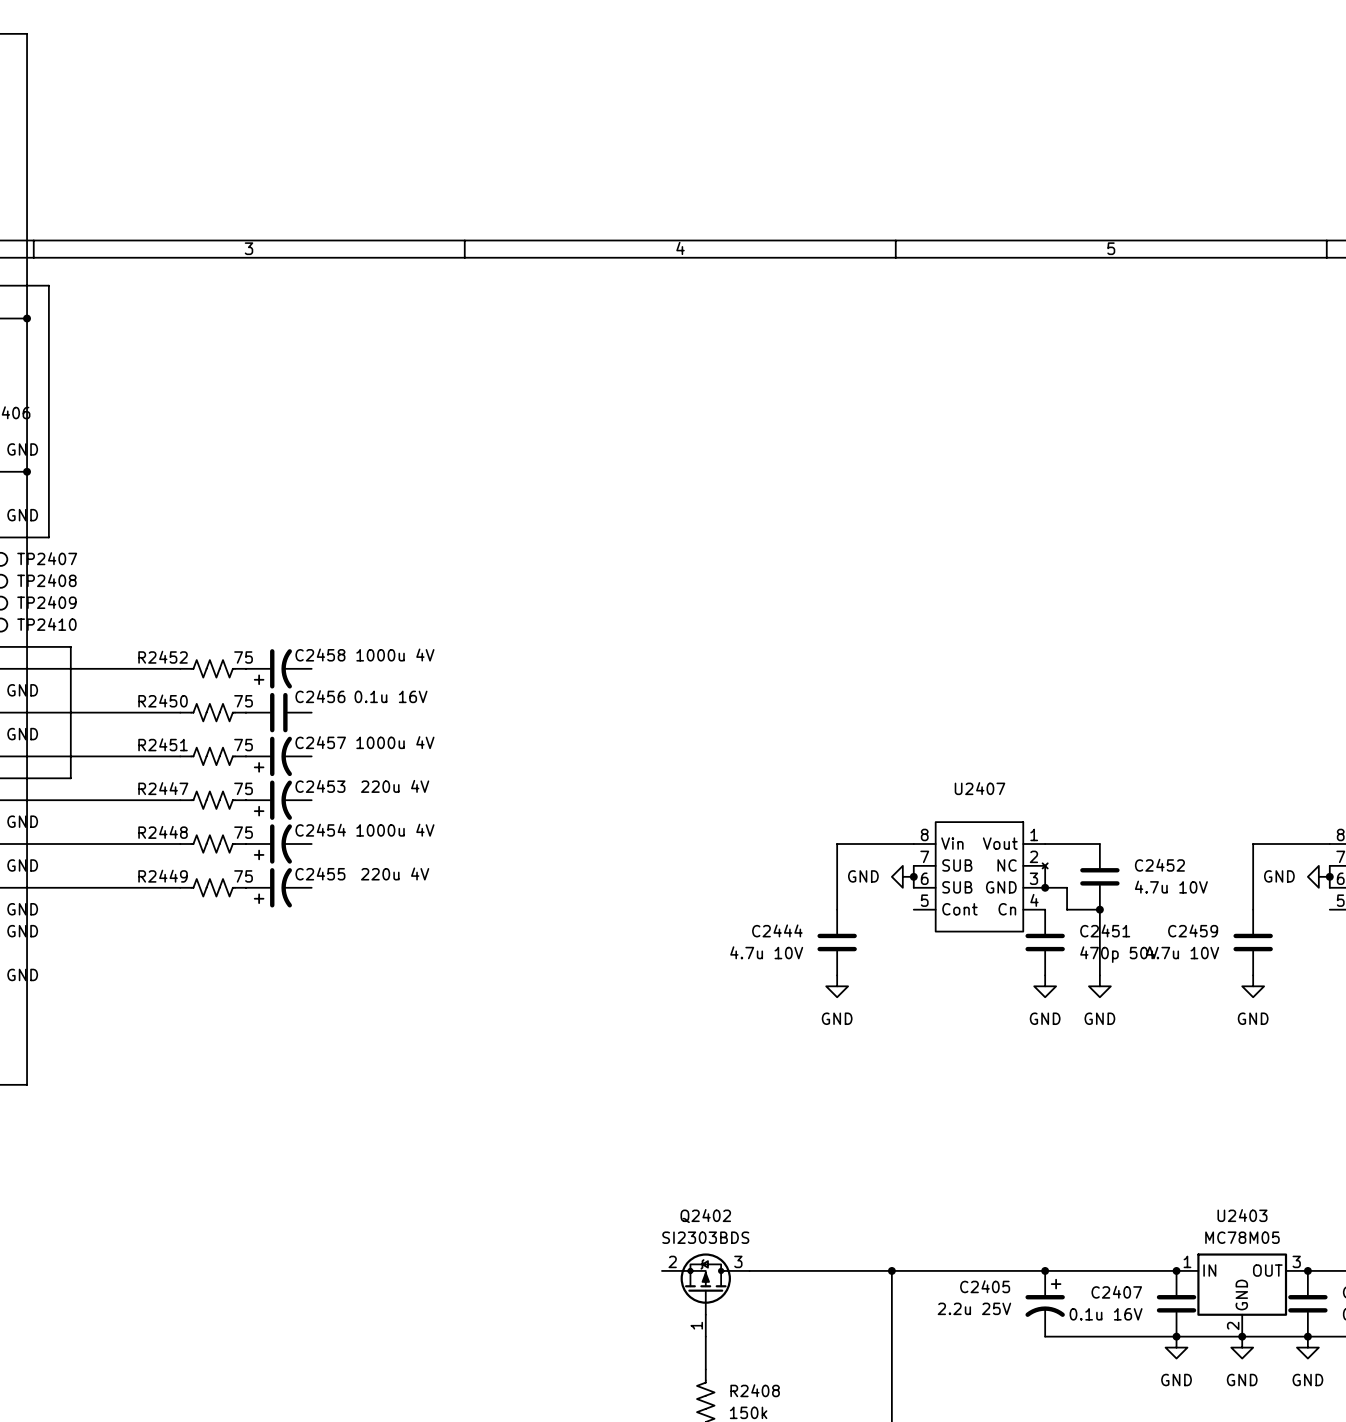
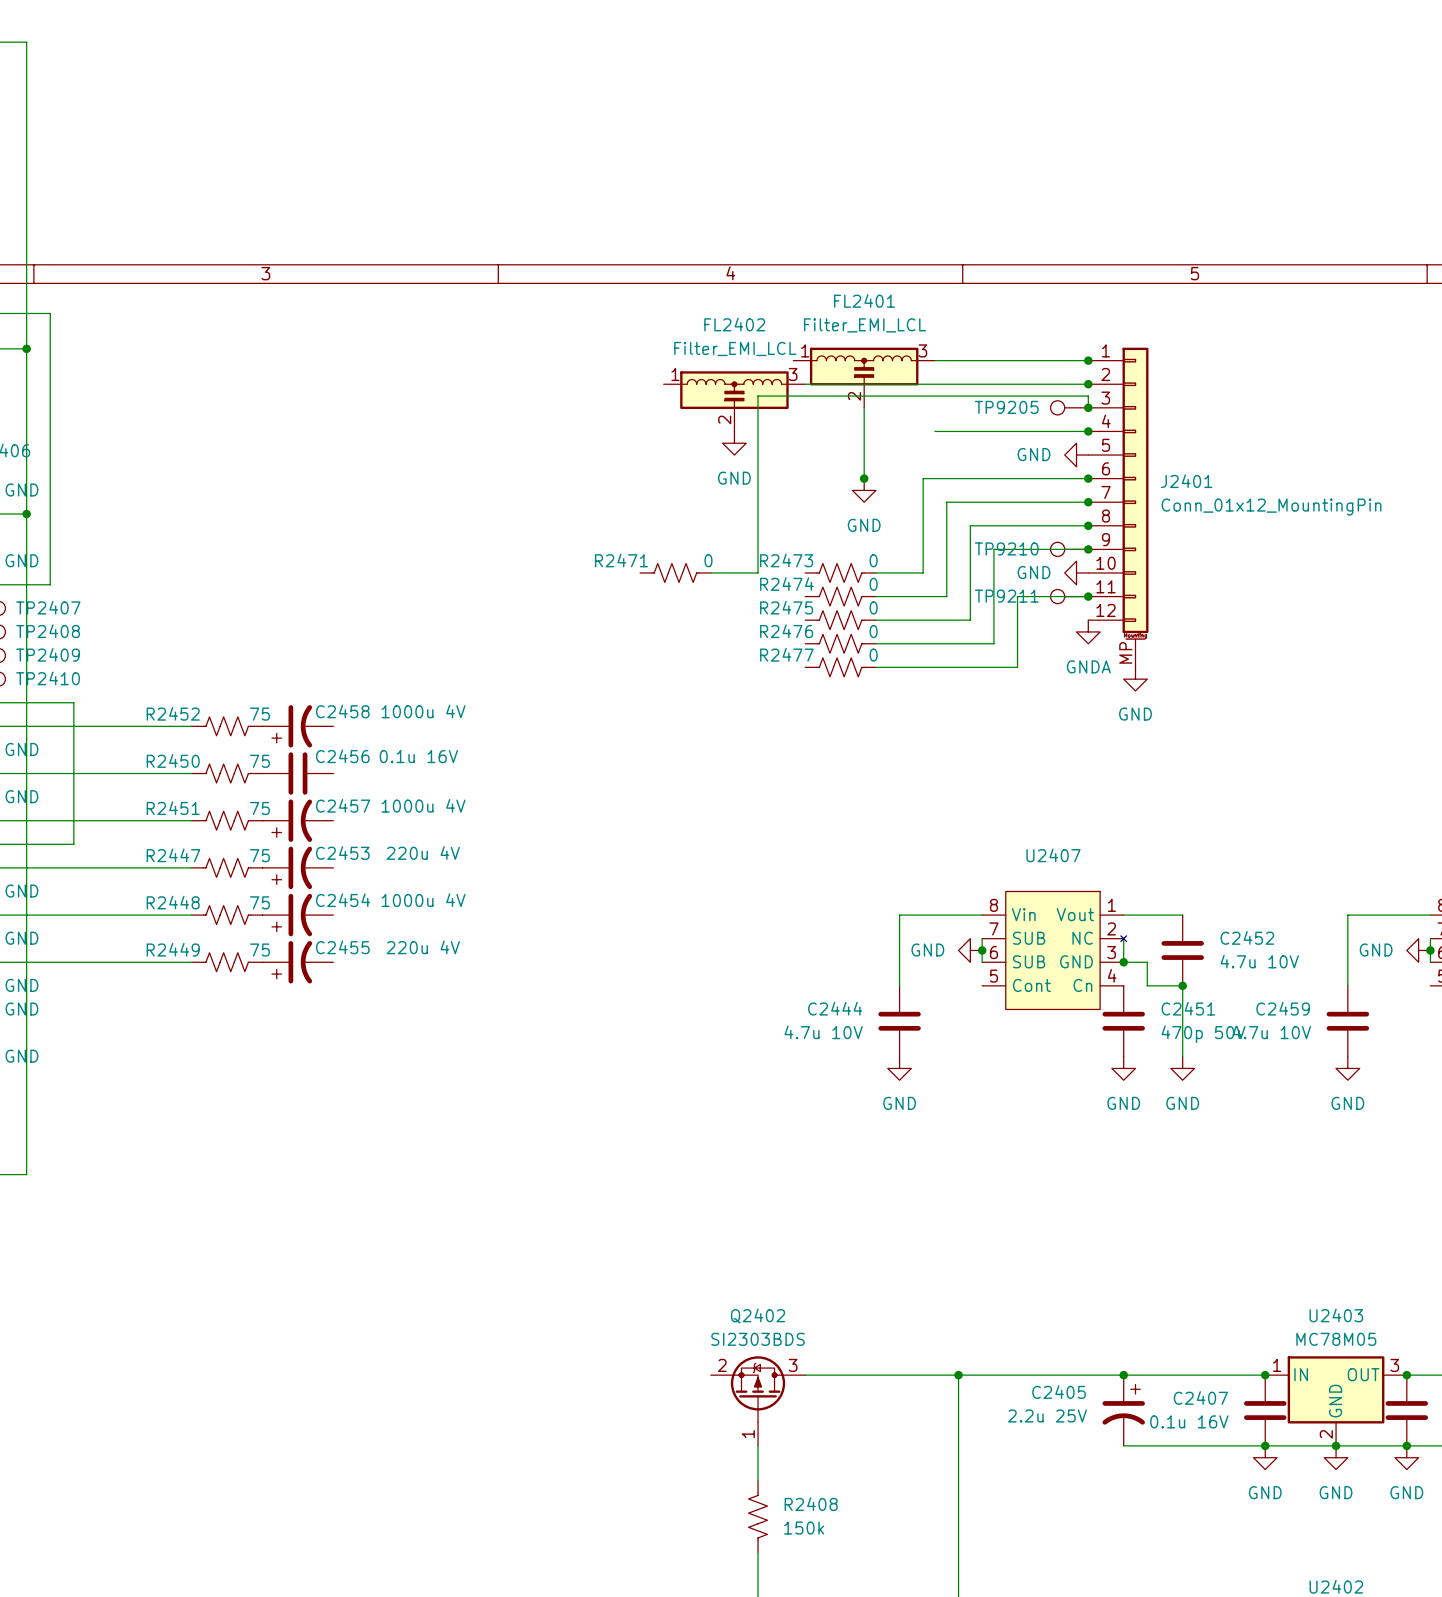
wire: none -> (934, 360) (1088, 360)
junction: none -> (1088, 360)
FL2401: none -> Filter_EMI_LCL (864, 377)
wire: none -> (805, 384) (1088, 384)
junction: none -> (1088, 384)
FL2402: none -> Filter_EMI_LCL (734, 401)
wire: none -> (864, 407) (864, 478)
TP9205: none -> (1069, 407)
wire: none -> (1088, 407) (1088, 396) (758, 396) (758, 572) (710, 572)
junction: none -> (1088, 407)
wire: none -> (934, 431) (1088, 431)
junction: none -> (1088, 431)
power symbol: none -> GND (734, 443)
power symbol: none -> GND (1076, 455)
junction: none -> (864, 478)
wire: none -> (1088, 478) (923, 478) (923, 572) (875, 572)
junction: none -> (1088, 478)
power symbol: none -> GND (864, 490)
wire: none -> (1088, 502) (946, 502) (946, 596) (875, 596)
junction: none -> (1088, 502)
J2401: none -> Conn_01x12_MountingPin (1118, 507)
wire: none -> (1088, 525) (970, 525) (970, 620) (875, 620)
junction: none -> (1088, 525)
TP9210: none -> (1069, 549)
wire: none -> (1088, 549) (993, 549) (993, 643) (875, 643)
junction: none -> (1088, 549)
R2471: none -> 0 (675, 572)
R2473: none -> 0 (840, 572)
power symbol: none -> GND (1076, 572)
R2474: none -> 0 (840, 596)
TP9211: none -> (1069, 596)
wire: none -> (1088, 596) (1017, 596) (1017, 667) (875, 667)
junction: none -> (1088, 596)
R2475: none -> 0 (840, 620)
power symbol: none -> GNDA (1088, 631)
R2476: none -> 0 (840, 643)
R2477: none -> 0 (840, 667)
power symbol: none -> GND (1135, 679)

